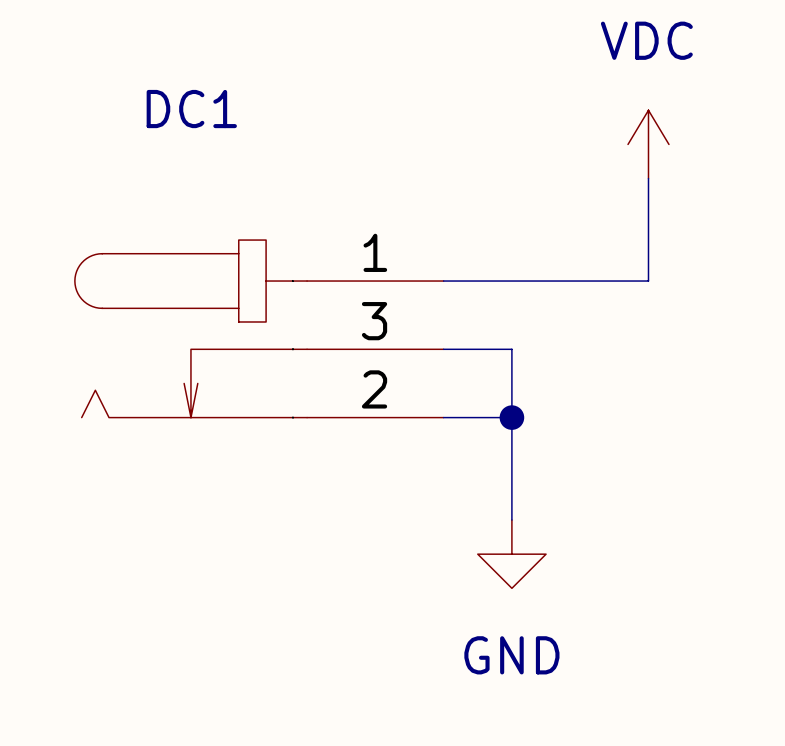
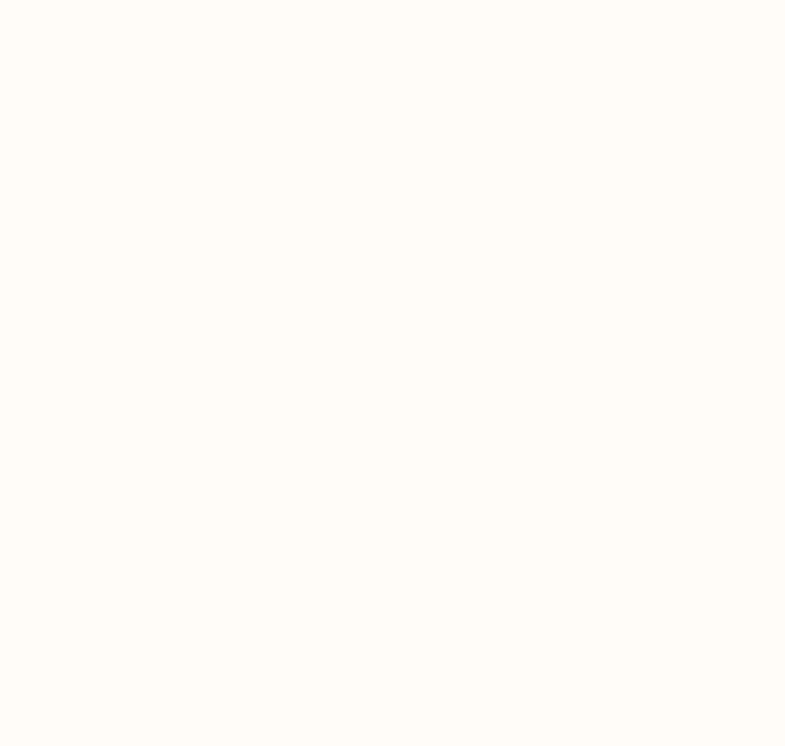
power symbol: VDC (648, 144) -> none
wire: (648, 178) (648, 281) (443, 281) -> none
DC1: (259, 328) -> none
wire: (443, 349) (511, 349) (511, 520) -> none
wire: (443, 417) (511, 417) -> none
junction: (511, 417) -> none
power symbol: GND (511, 554) -> none

